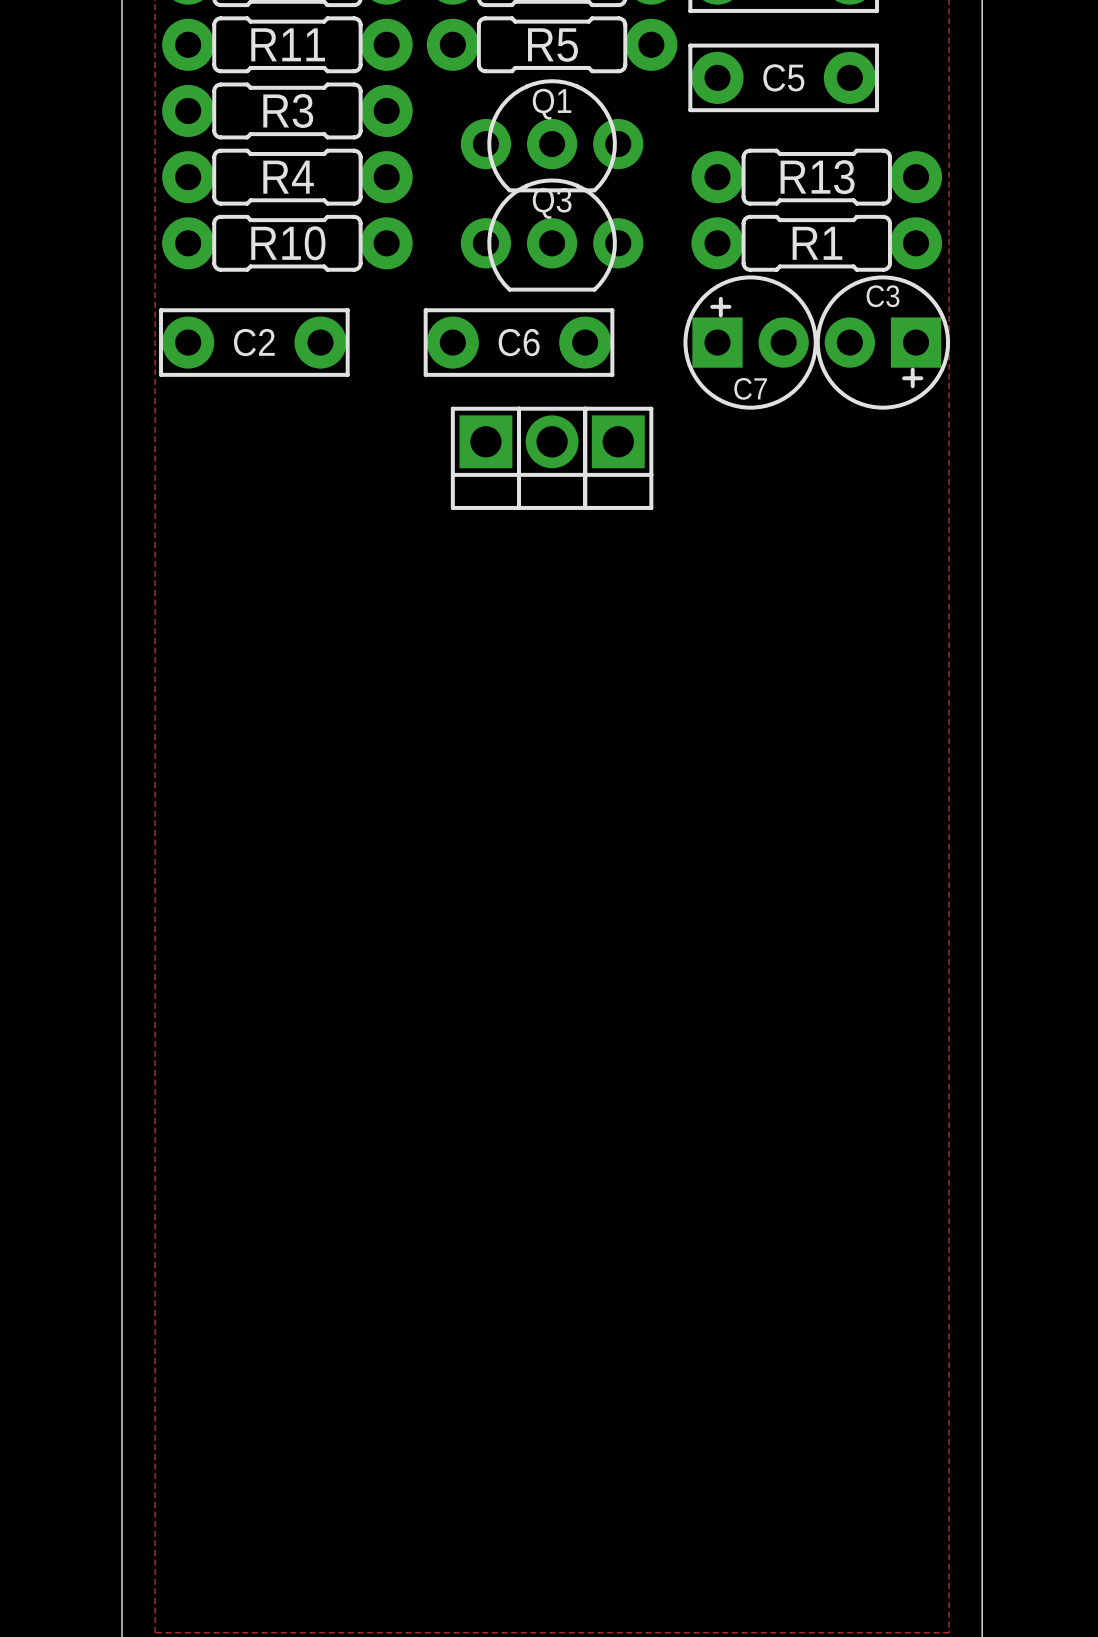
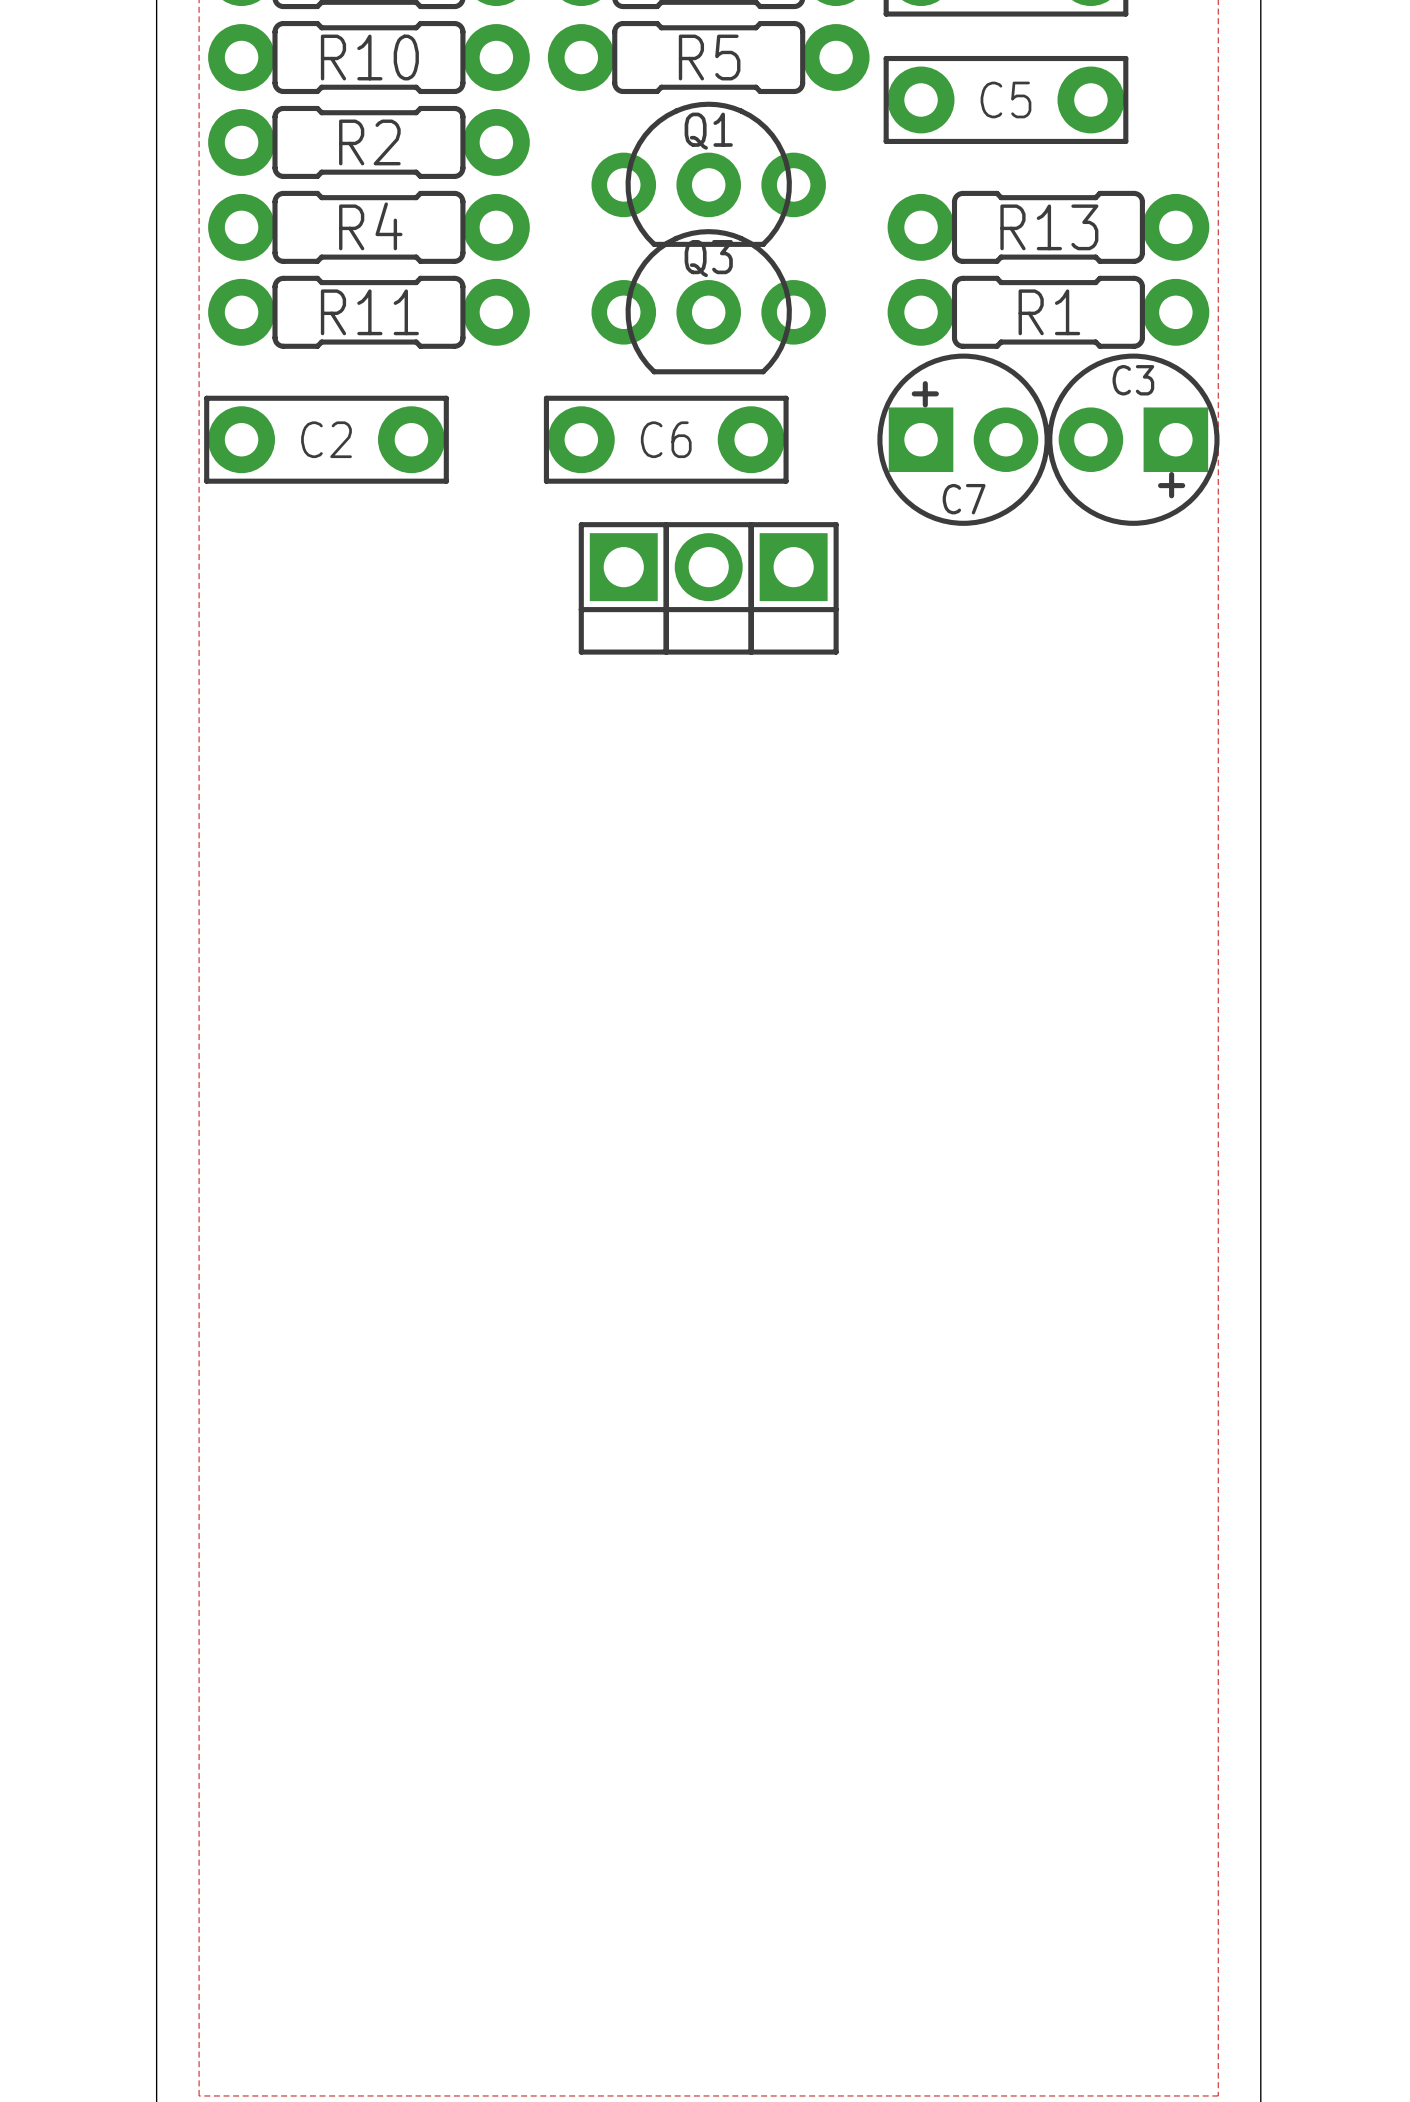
R11 name: R11 (288, 44) -> R10 (369, 57)
R3 name: R3 (288, 110) -> R2 (369, 142)
R10 name: R10 (288, 243) -> R11 (369, 312)

